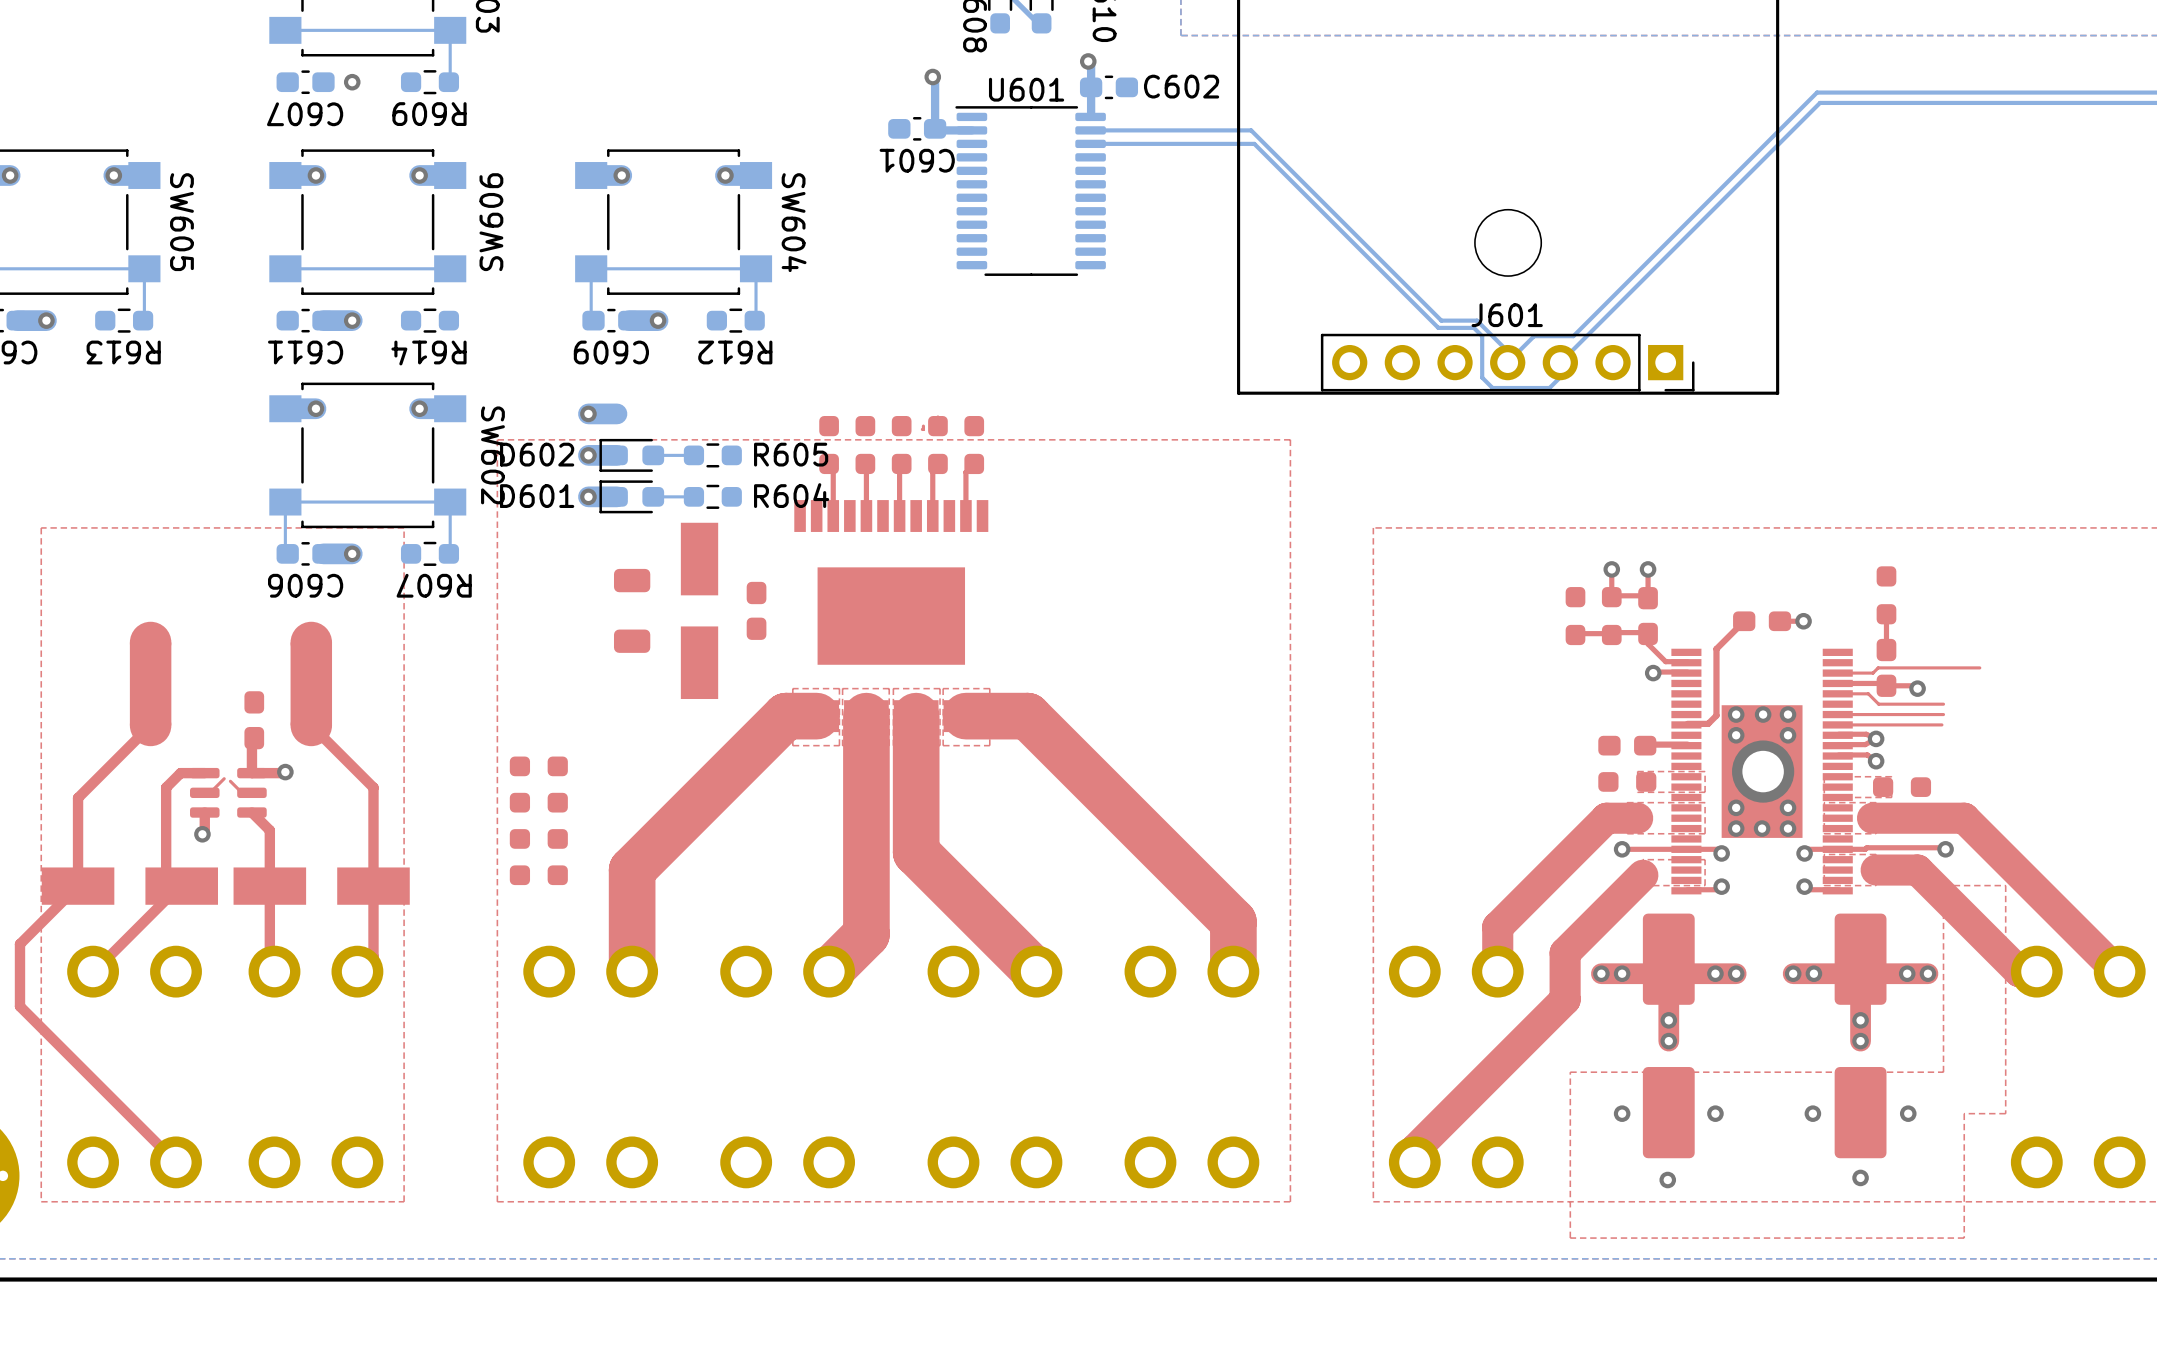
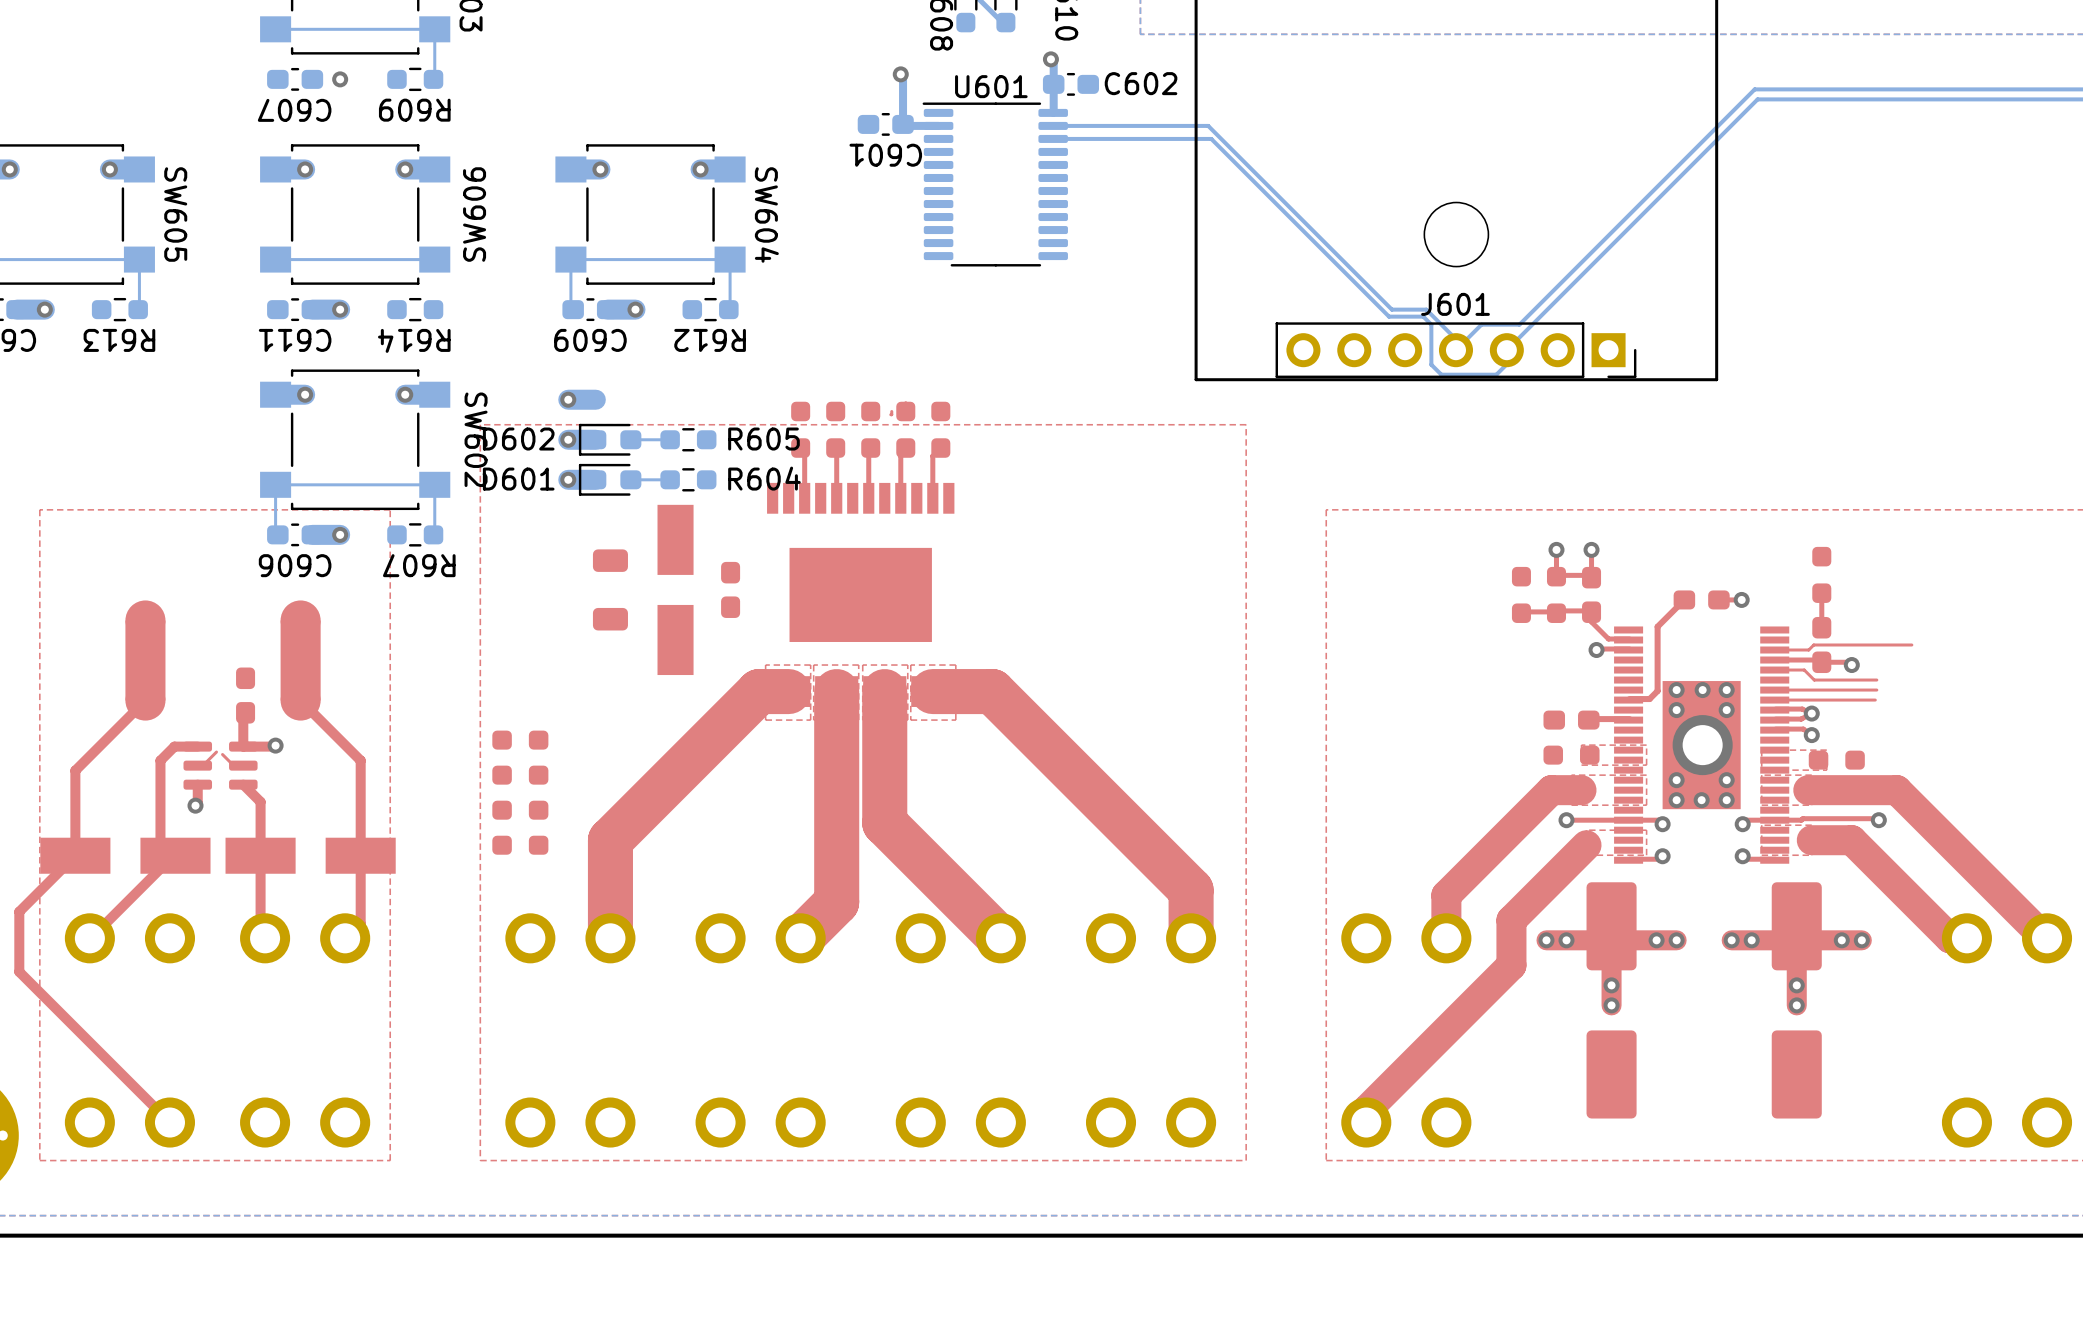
top zone outline: (2005, 885) (1943, 885) (1943, 1072) (1570, 1072) (1570, 1238) (1964, 1238) (1964, 1113) (2005, 1113) (2005, 885) -> none
via: (1622, 1113) -> none
via: (1715, 1113) -> none
via: (1812, 1113) -> none
via: (1908, 1113) -> none
via: (1860, 1177) -> none
via: (1667, 1180) -> none

